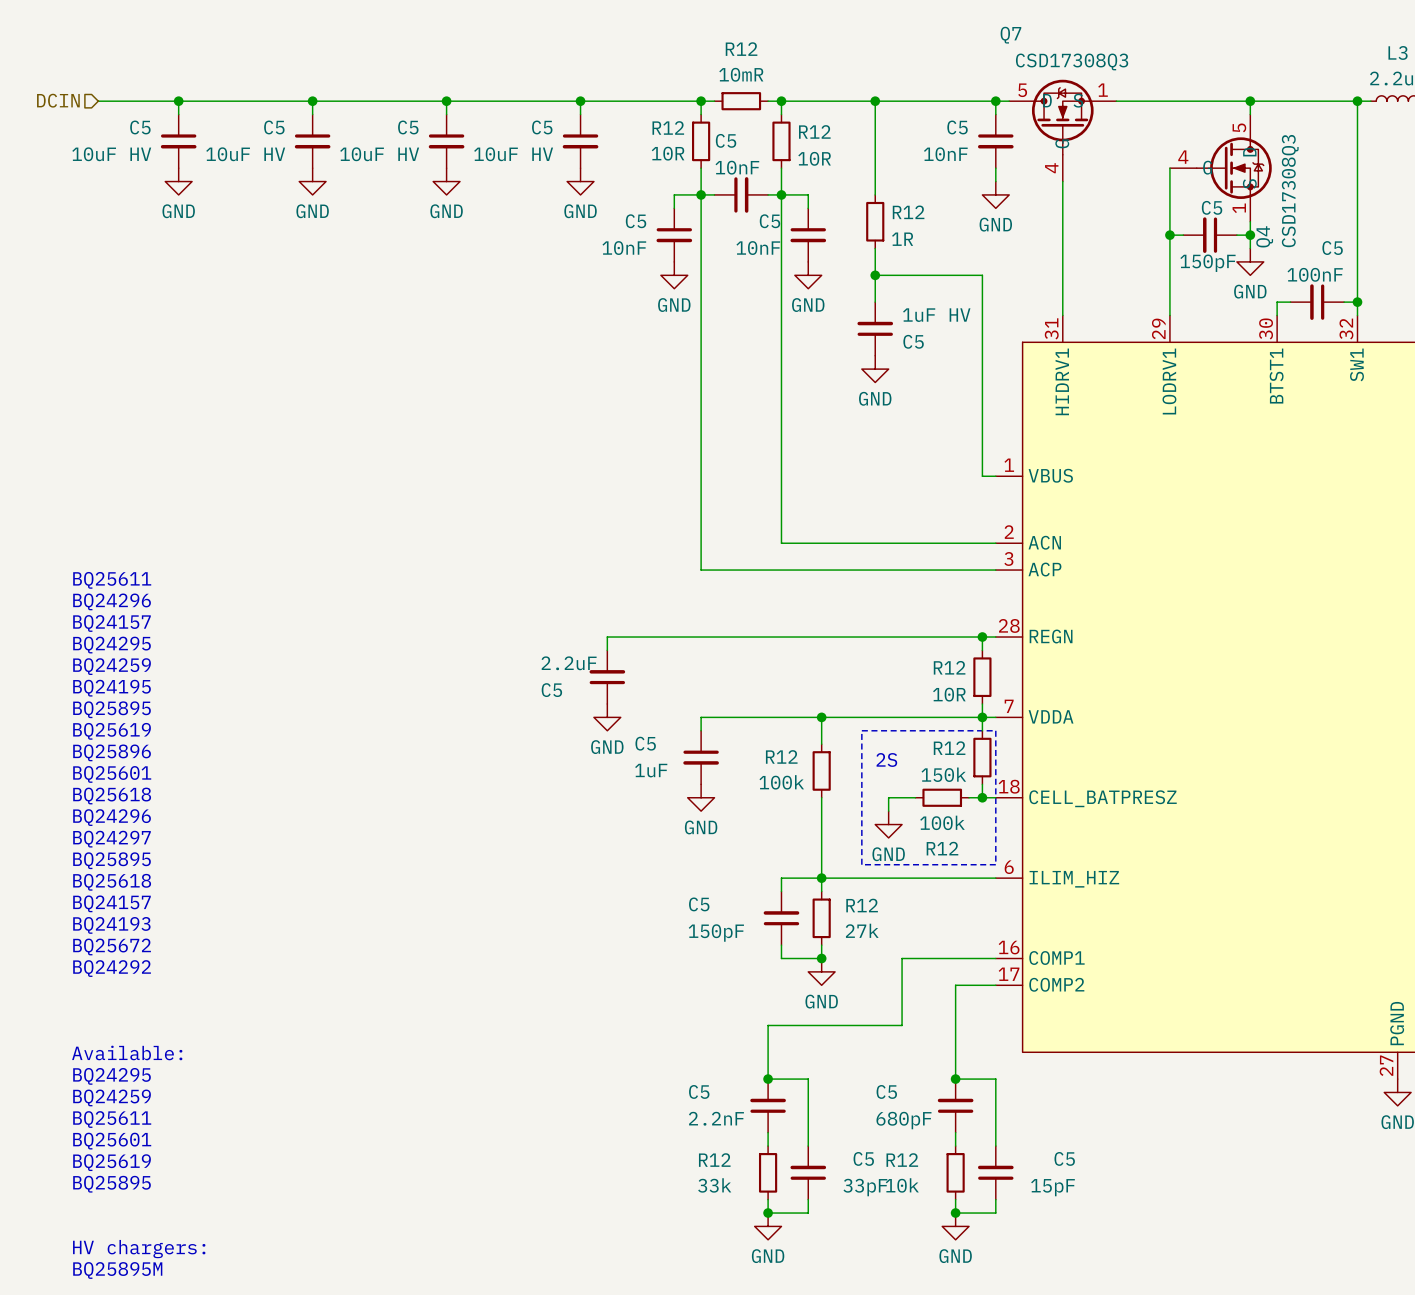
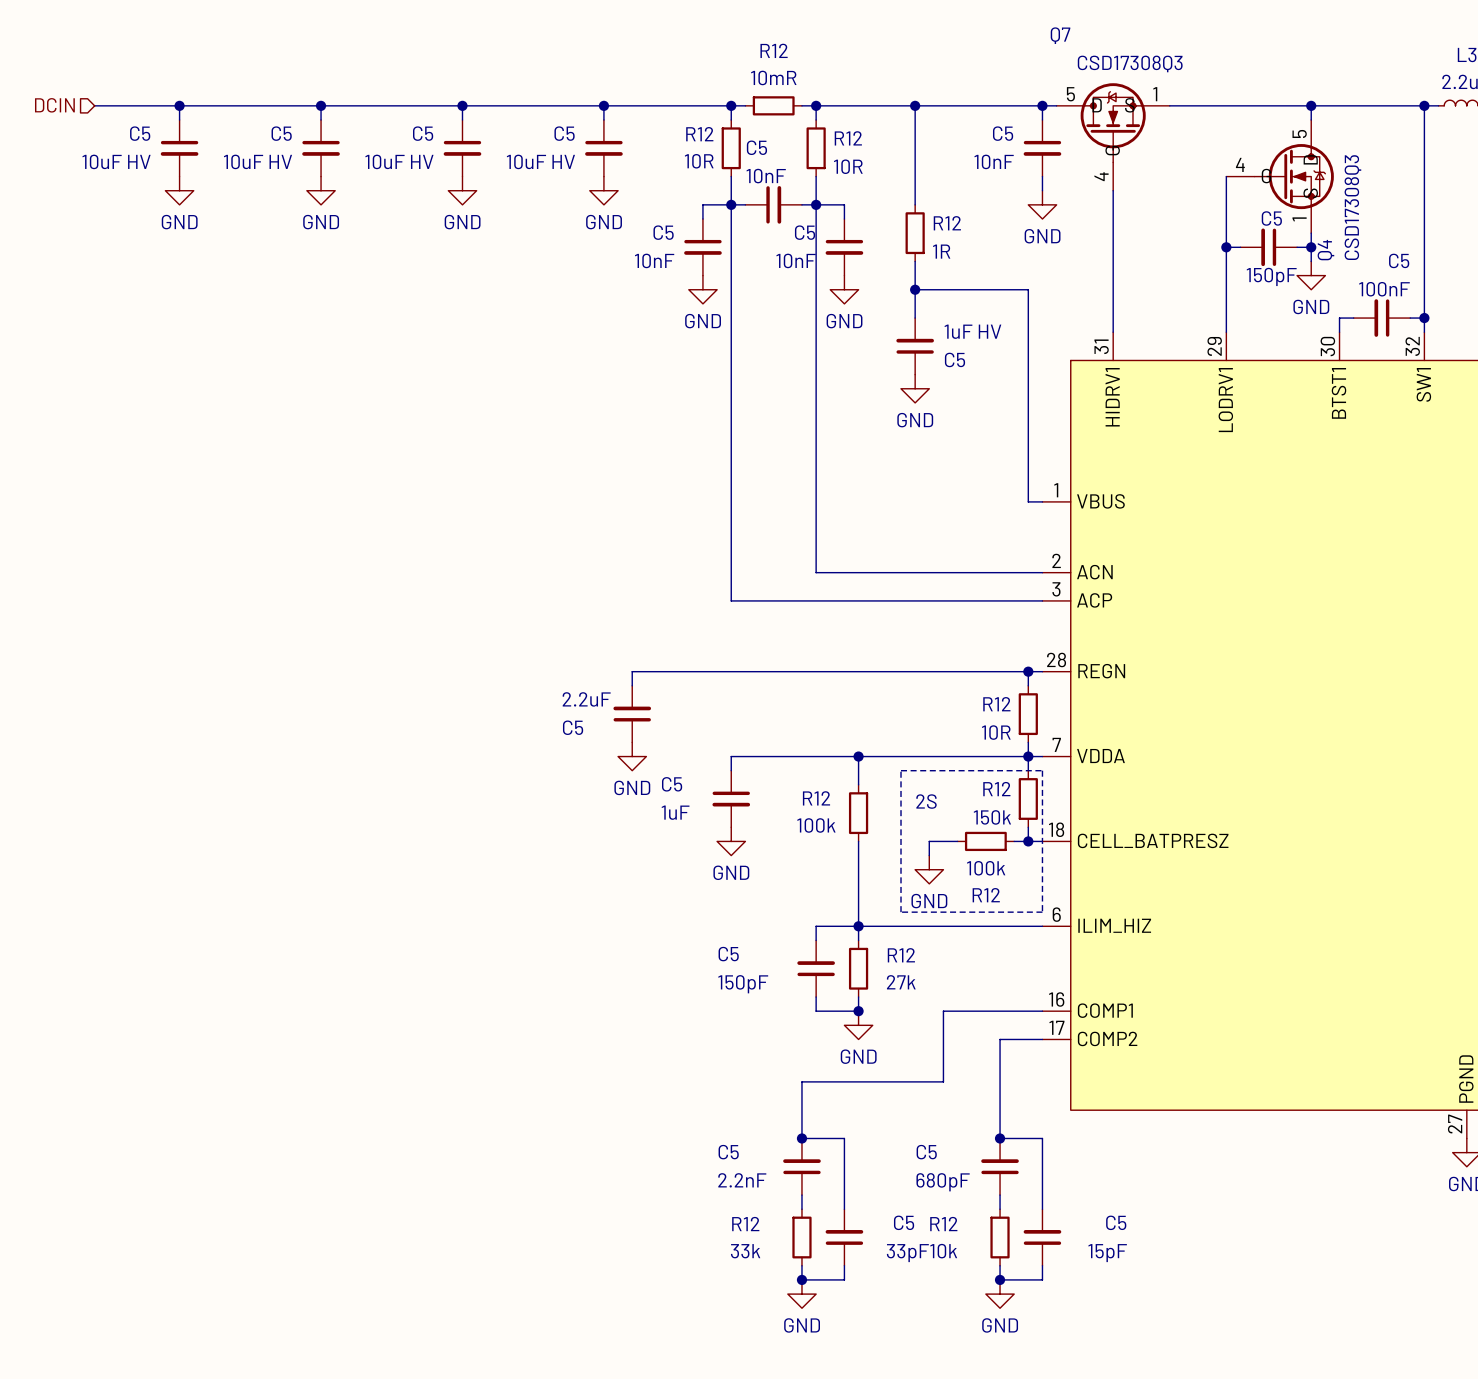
text: BQ25611 (112, 580) -> none
text: BQ24296 (112, 601) -> none
text: BQ24157 (111, 623) -> none
text: BQ24295 (112, 645) -> none
text: BQ24259 (112, 666) -> none
text: BQ24195 (112, 688) -> none
text: BQ25895 (112, 709) -> none
text: BQ25619 (112, 731) -> none
text: BQ25896 (112, 752) -> none
text: BQ25601 (112, 774) -> none
text: BQ25618 (112, 796) -> none
text: BQ24296 (112, 817) -> none
text: BQ24297 (111, 839) -> none
text: BQ25895 (112, 860) -> none
text: BQ25618 (112, 882) -> none
text: BQ24157 (111, 903) -> none
text: BQ24193 (111, 925) -> none
text: BQ25672 (112, 946) -> none
text: BQ24292 (112, 968) -> none
text: Available: (127, 1052) -> none
text: BQ24295 (112, 1076) -> none
text: BQ24259 (112, 1097) -> none
text: BQ25611 (112, 1119) -> none
text: BQ25601 (112, 1141) -> none
text: BQ25619 (112, 1162) -> none
text: BQ25895 (112, 1184) -> none
text: HV chargers: (139, 1249) -> none
text: BQ25895M (117, 1270) -> none

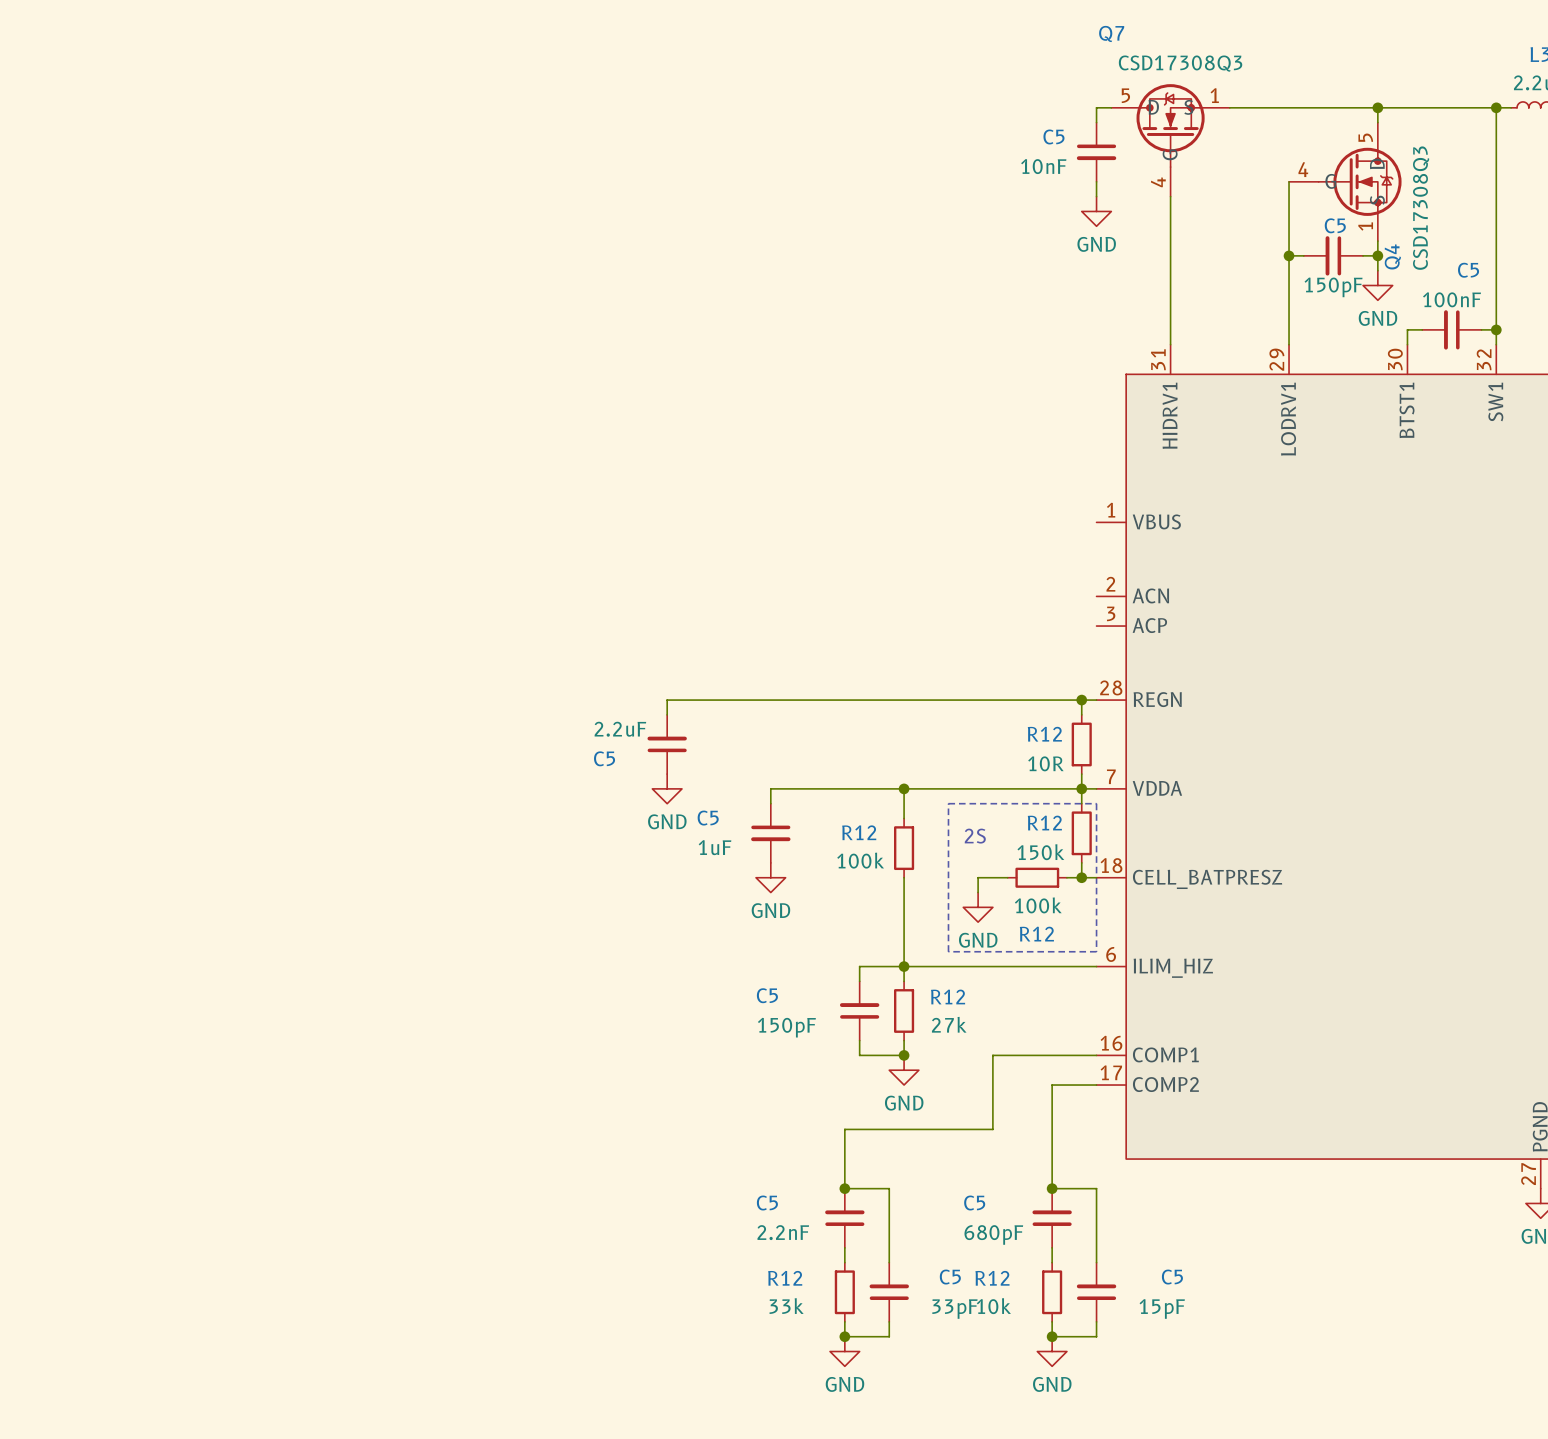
hierarchical label: DCIN (54, 105) -> none
wire: (94, 105) (745, 105) -> none
wire: (179, 105) (179, 120) -> none
junction: (179, 105) -> none
wire: (321, 105) (321, 120) -> none
junction: (321, 105) -> none
wire: (462, 105) (462, 120) -> none
junction: (462, 105) -> none
wire: (603, 105) (603, 120) -> none
junction: (603, 105) -> none
wire: (731, 105) (731, 120) -> none
junction: (731, 105) -> none
R12: 10mR (773, 105) -> none
wire: (801, 105) (1042, 105) -> none
wire: (816, 105) (816, 120) -> none
junction: (816, 105) -> none
wire: (915, 105) (915, 204) -> none
junction: (915, 105) -> none
junction: (1042, 105) -> none
C5: 10uF HV (179, 148) -> none
C5: 10uF HV (321, 148) -> none
C5: 10uF HV (462, 148) -> none
C5: 10uF HV (603, 148) -> none
R12: 10R (731, 148) -> none
R12: 10R (816, 148) -> none
wire: (731, 176) (731, 600) (1042, 600) -> none
wire: (816, 176) (816, 572) (1042, 572) -> none
power symbol: GND (179, 190) -> none
power symbol: GND (321, 190) -> none
power symbol: GND (462, 190) -> none
power symbol: GND (603, 190) -> none
junction: (731, 204) -> none
wire: (745, 204) (702, 204) (702, 219) -> none
C5: 10nF (773, 204) -> none
wire: (801, 204) (844, 204) (844, 219) -> none
junction: (816, 204) -> none
R12: 1R (915, 233) -> none
C5: 10nF (702, 247) -> none
C5: 10nF (844, 247) -> none
wire: (915, 261) (915, 318) -> none
power symbol: GND (702, 289) -> none
power symbol: GND (844, 289) -> none
wire: (915, 289) (1028, 289) (1028, 501) (1042, 501) -> none
junction: (915, 289) -> none
C5: 1uF HV (915, 346) -> none
power symbol: GND (915, 388) -> none

